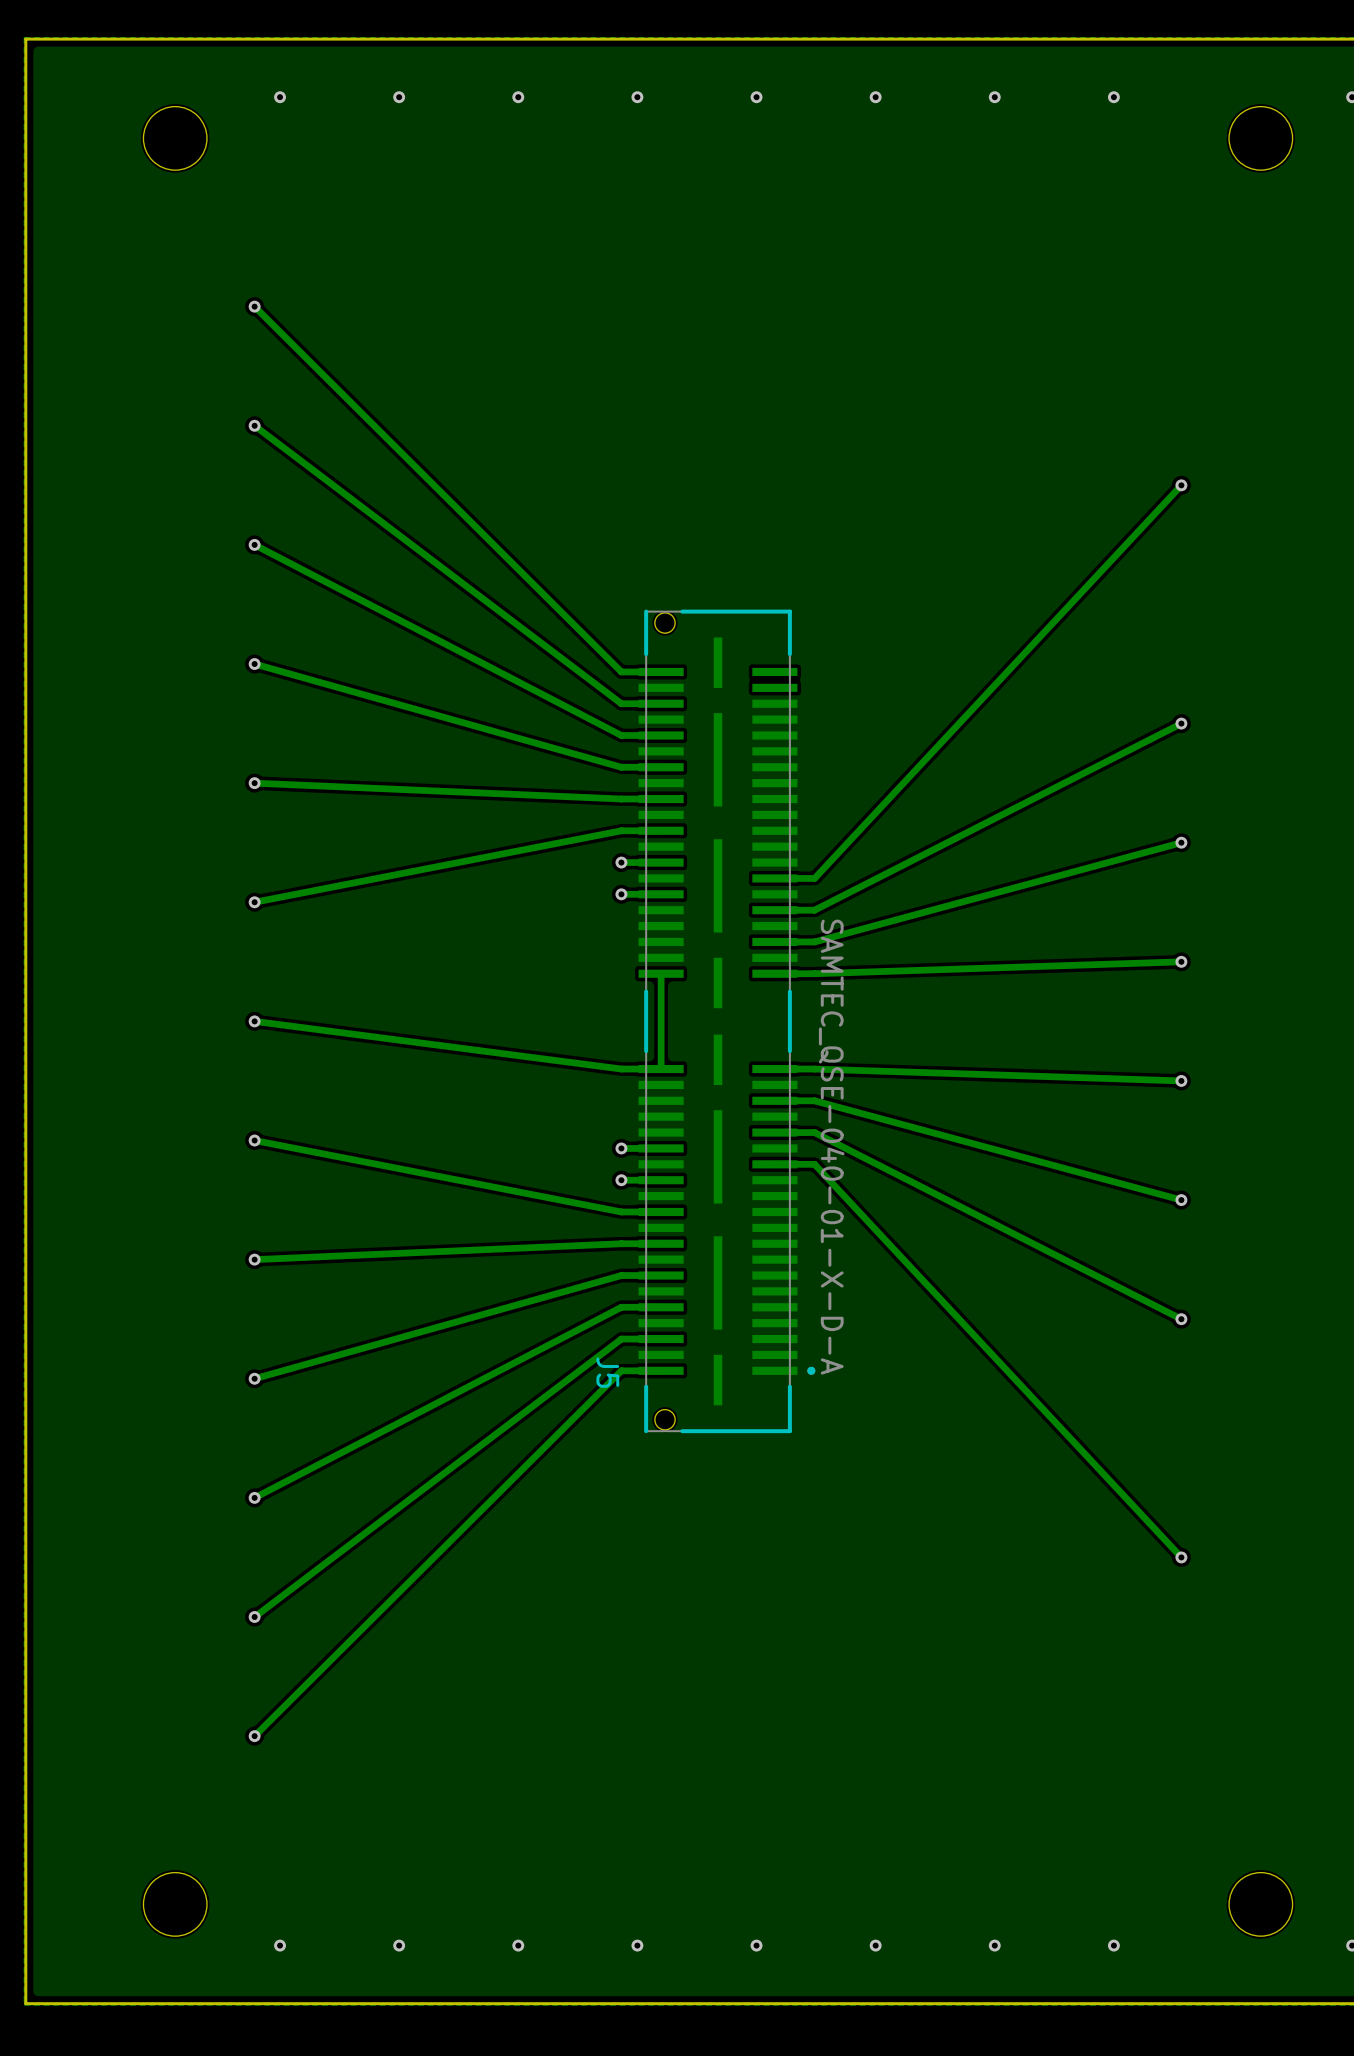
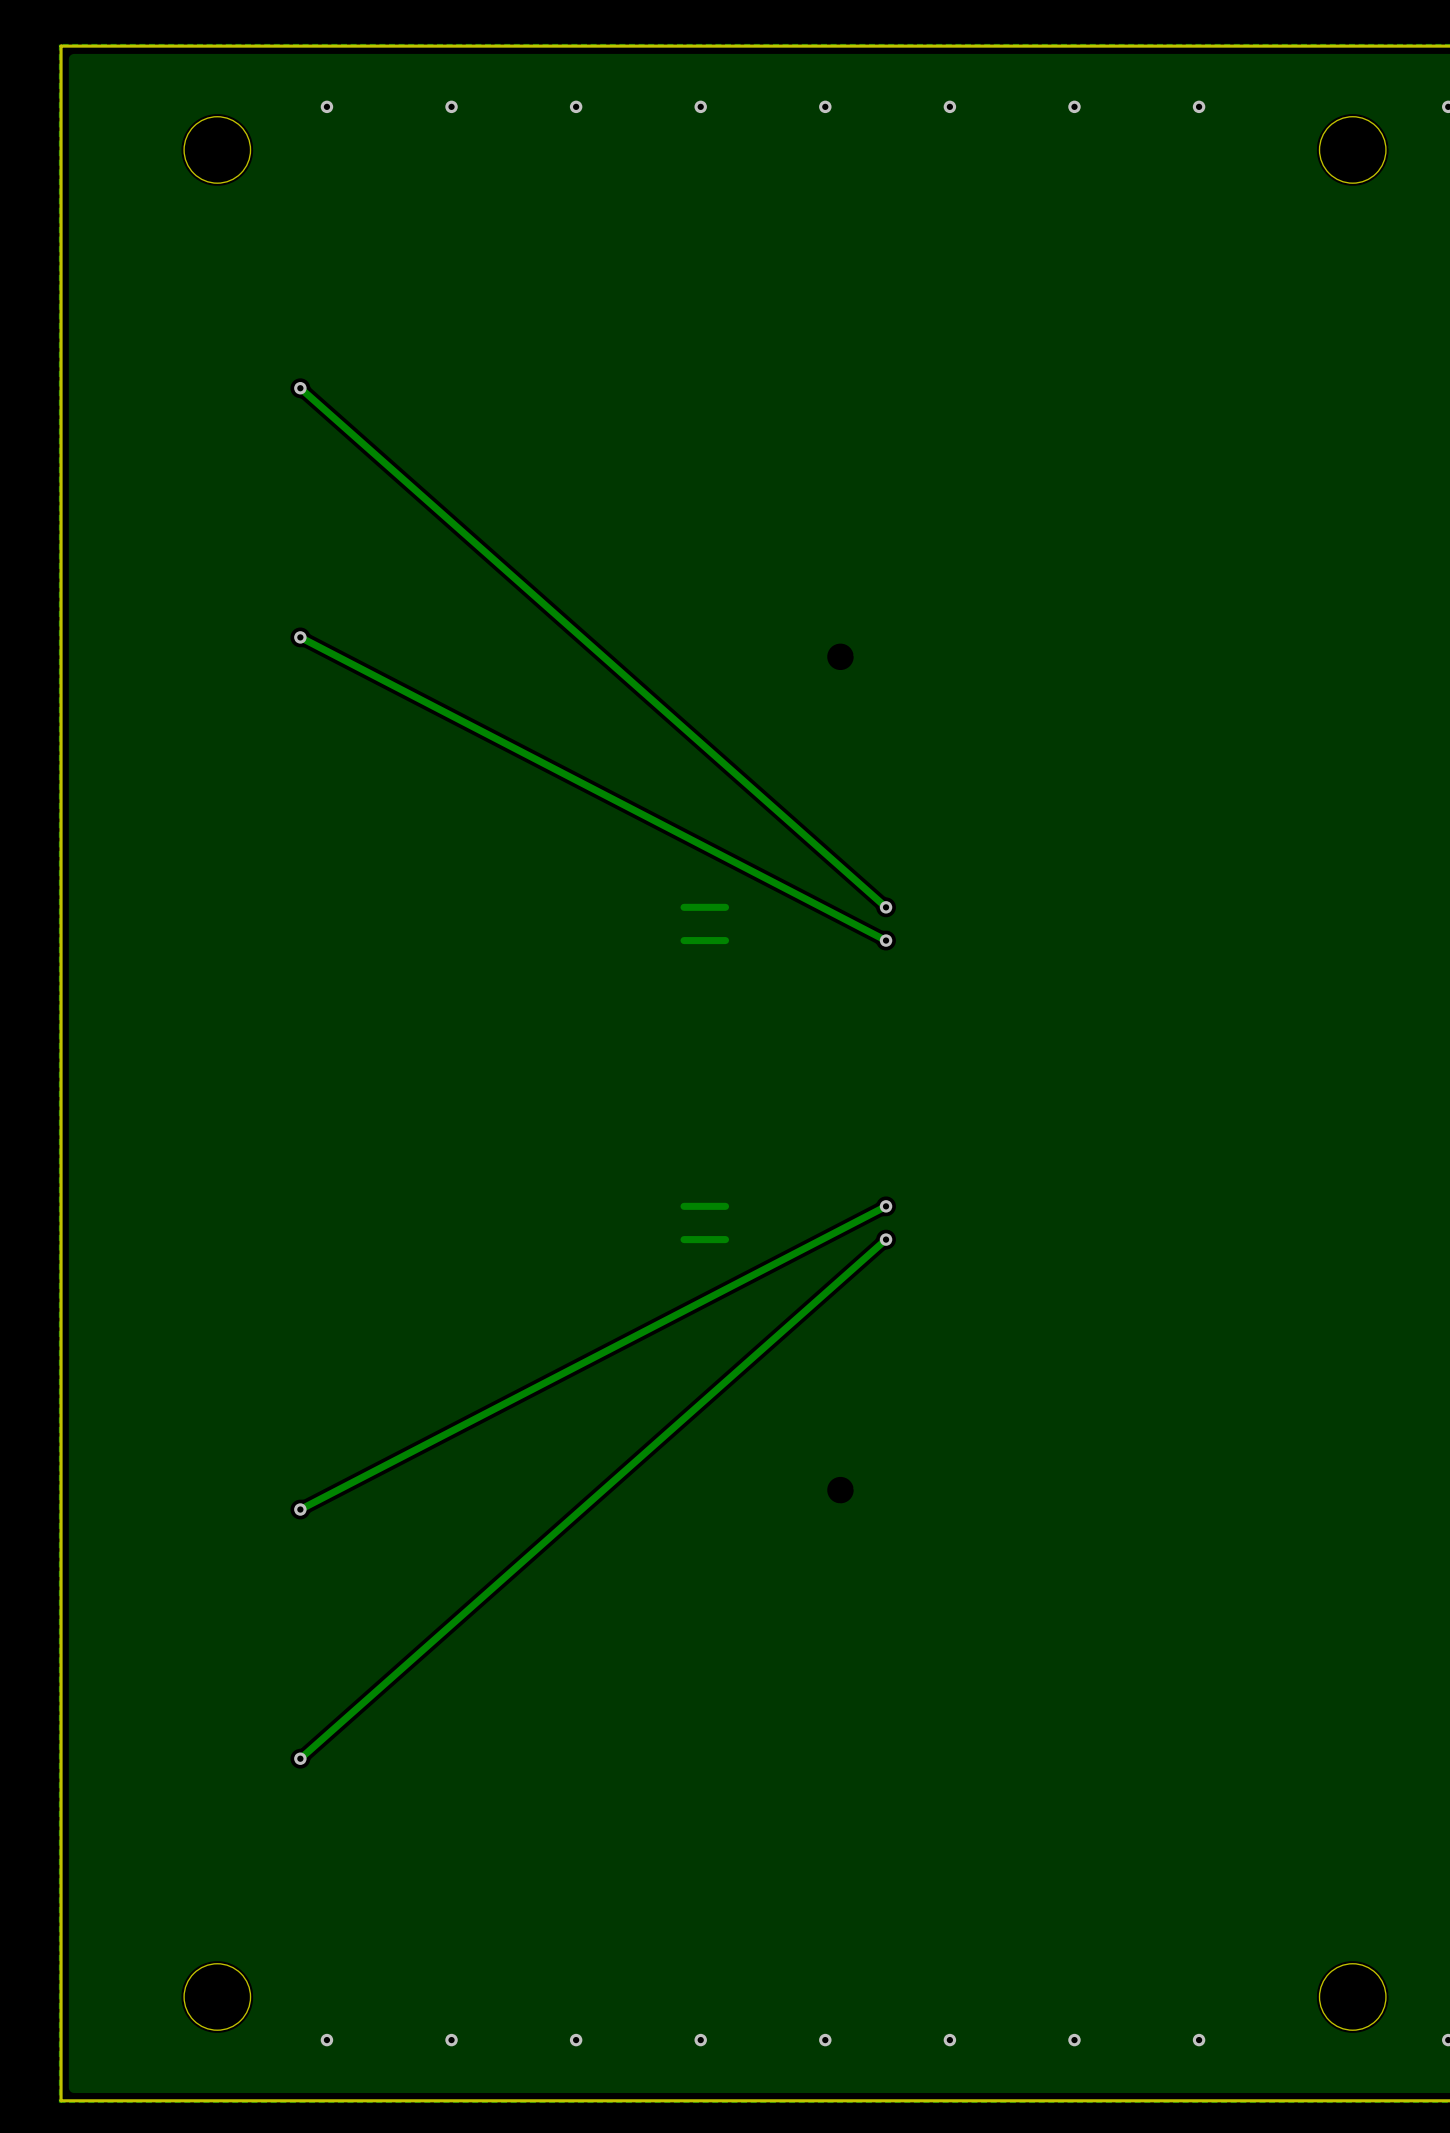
track: (254, 306) (621, 671) (661, 671) -> none
via: (254, 306) -> none
track: none -> (300, 388) (886, 907)
via: none -> (300, 388)
track: (254, 425) (621, 703) (661, 703) -> none
via: (254, 425) -> none
track: (1181, 485) (814, 878) (774, 878) -> none
via: (1181, 485) -> none
track: (254, 544) (621, 735) (661, 735) -> none
via: (254, 544) -> none
track: none -> (300, 637) (886, 940)
via: none -> (300, 637)
track: (254, 664) (621, 767) (661, 767) -> none
via: (254, 664) -> none
track: (1181, 723) (814, 910) (774, 910) -> none
via: (1181, 723) -> none
track: (254, 783) (621, 799) (661, 799) -> none
via: (254, 783) -> none
track: (661, 830) (621, 830) (254, 902) -> none
track: (1181, 842) (814, 941) (774, 941) -> none
via: (1181, 842) -> none
via: (621, 862) -> none
via: none -> (886, 907)
via: (621, 894) -> none
via: none -> (886, 940)
via: (254, 902) -> none
track: (1181, 961) (774, 973) -> none
via: (1181, 961) -> none
track: (661, 973) (661, 1069) (621, 1069) (254, 1021) -> none
via: (254, 1021) -> none
J5: SAMTEC_QSE-040-01-X-D-A (726, 1021) -> none
track: (774, 1069) (1181, 1080) -> none
via: (1181, 1080) -> none
track: (774, 1100) (814, 1100) (1181, 1200) -> none
track: (774, 1132) (814, 1132) (1181, 1319) -> none
track: (254, 1140) (621, 1211) (661, 1211) -> none
via: (254, 1140) -> none
via: (621, 1148) -> none
track: none -> (886, 1206) (300, 1509)
via: none -> (886, 1206)
track: (774, 1164) (814, 1164) (1181, 1557) -> none
via: (621, 1180) -> none
track: none -> (886, 1239) (300, 1758)
via: none -> (886, 1239)
via: (1181, 1200) -> none
track: (661, 1243) (621, 1243) (254, 1259) -> none
via: (254, 1259) -> none
track: (661, 1275) (621, 1275) (254, 1378) -> none
track: (661, 1307) (621, 1307) (254, 1497) -> none
via: (1181, 1319) -> none
track: (661, 1339) (621, 1339) (254, 1617) -> none
track: (661, 1370) (621, 1370) (254, 1736) -> none
via: (254, 1378) -> none
via: none -> (300, 1509)
via: (254, 1497) -> none
via: (1181, 1557) -> none
via: (254, 1617) -> none
via: none -> (300, 1758)
via: (254, 1736) -> none

